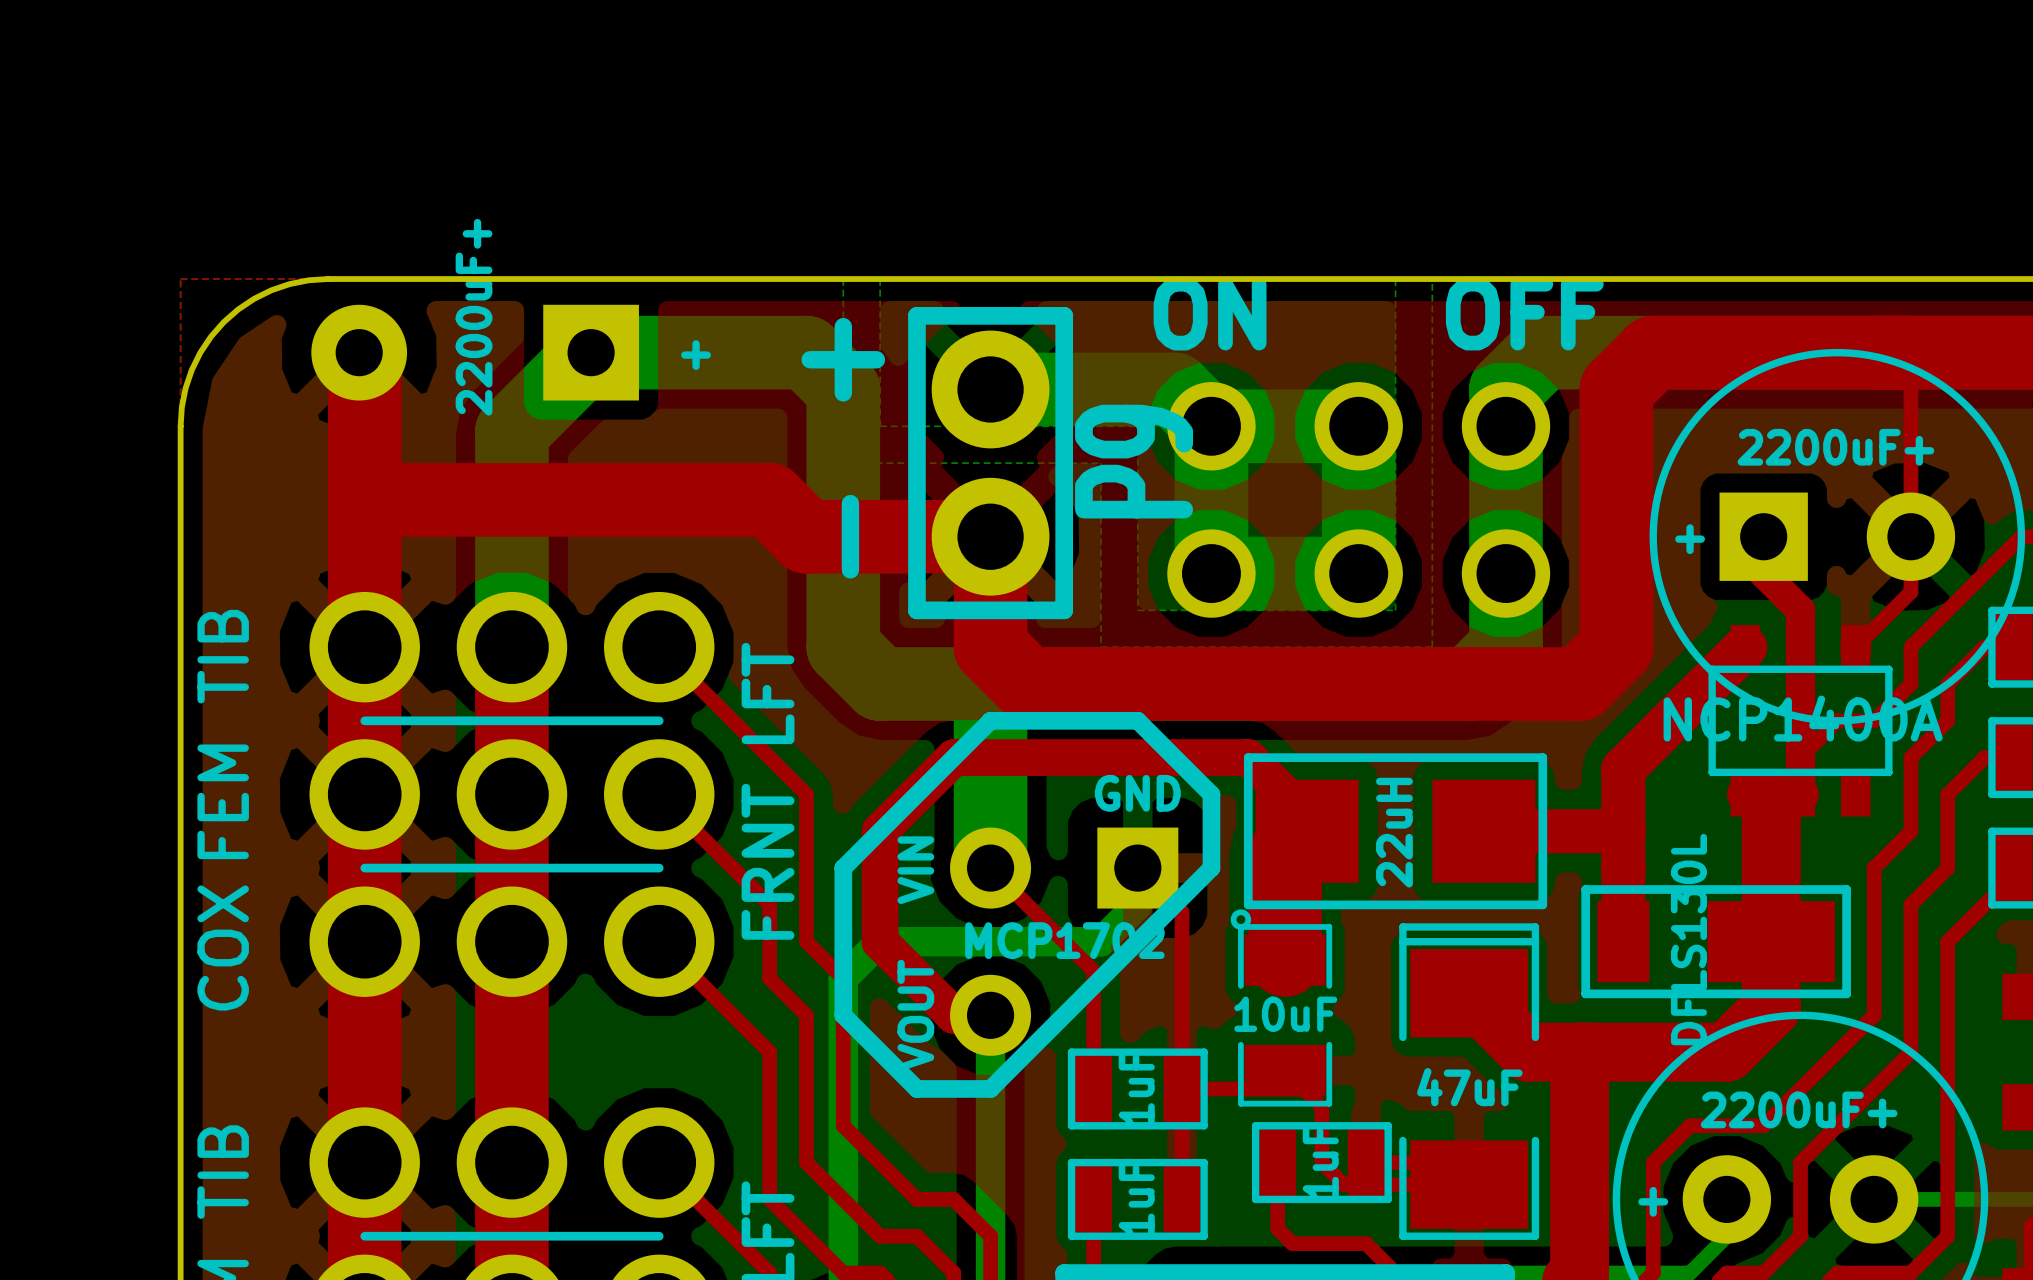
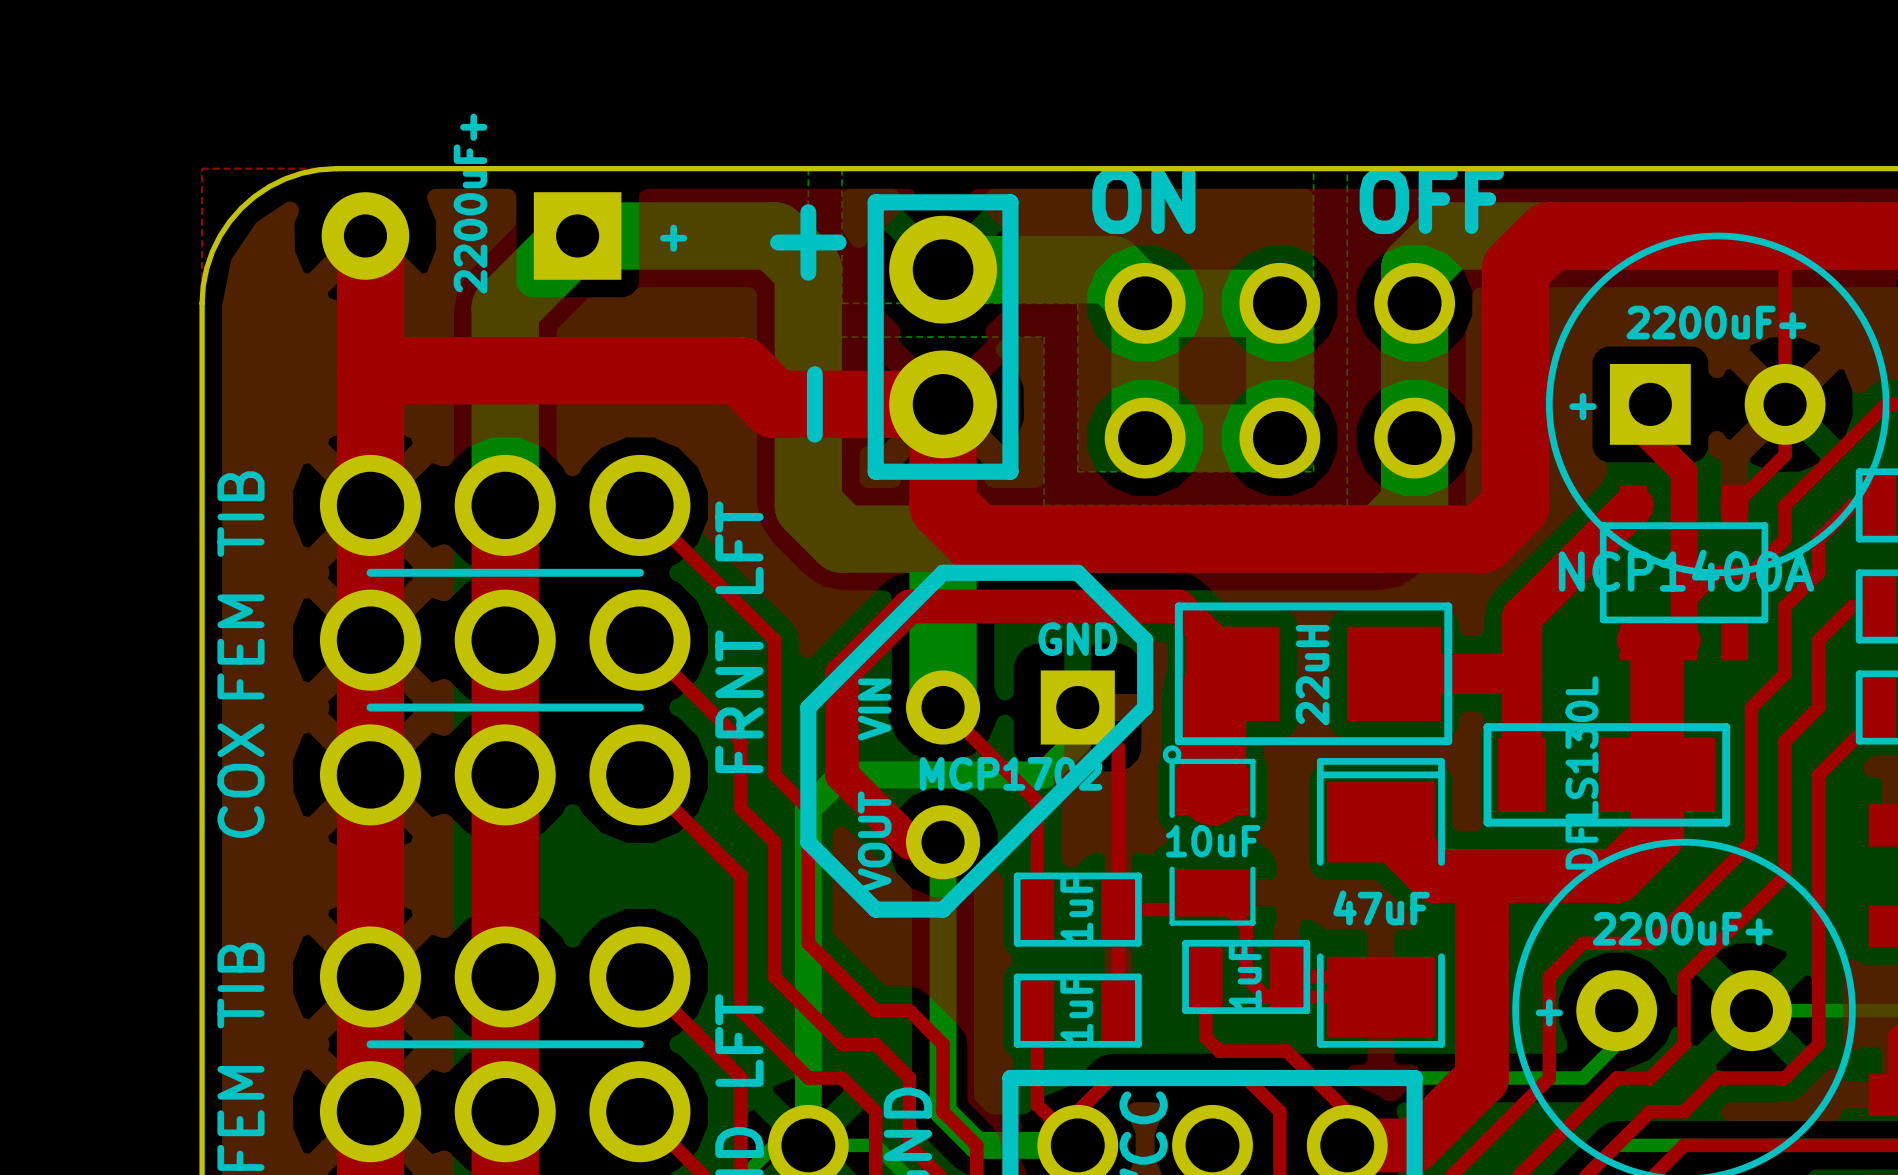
P9 name: P9 (1134, 461) -> none

